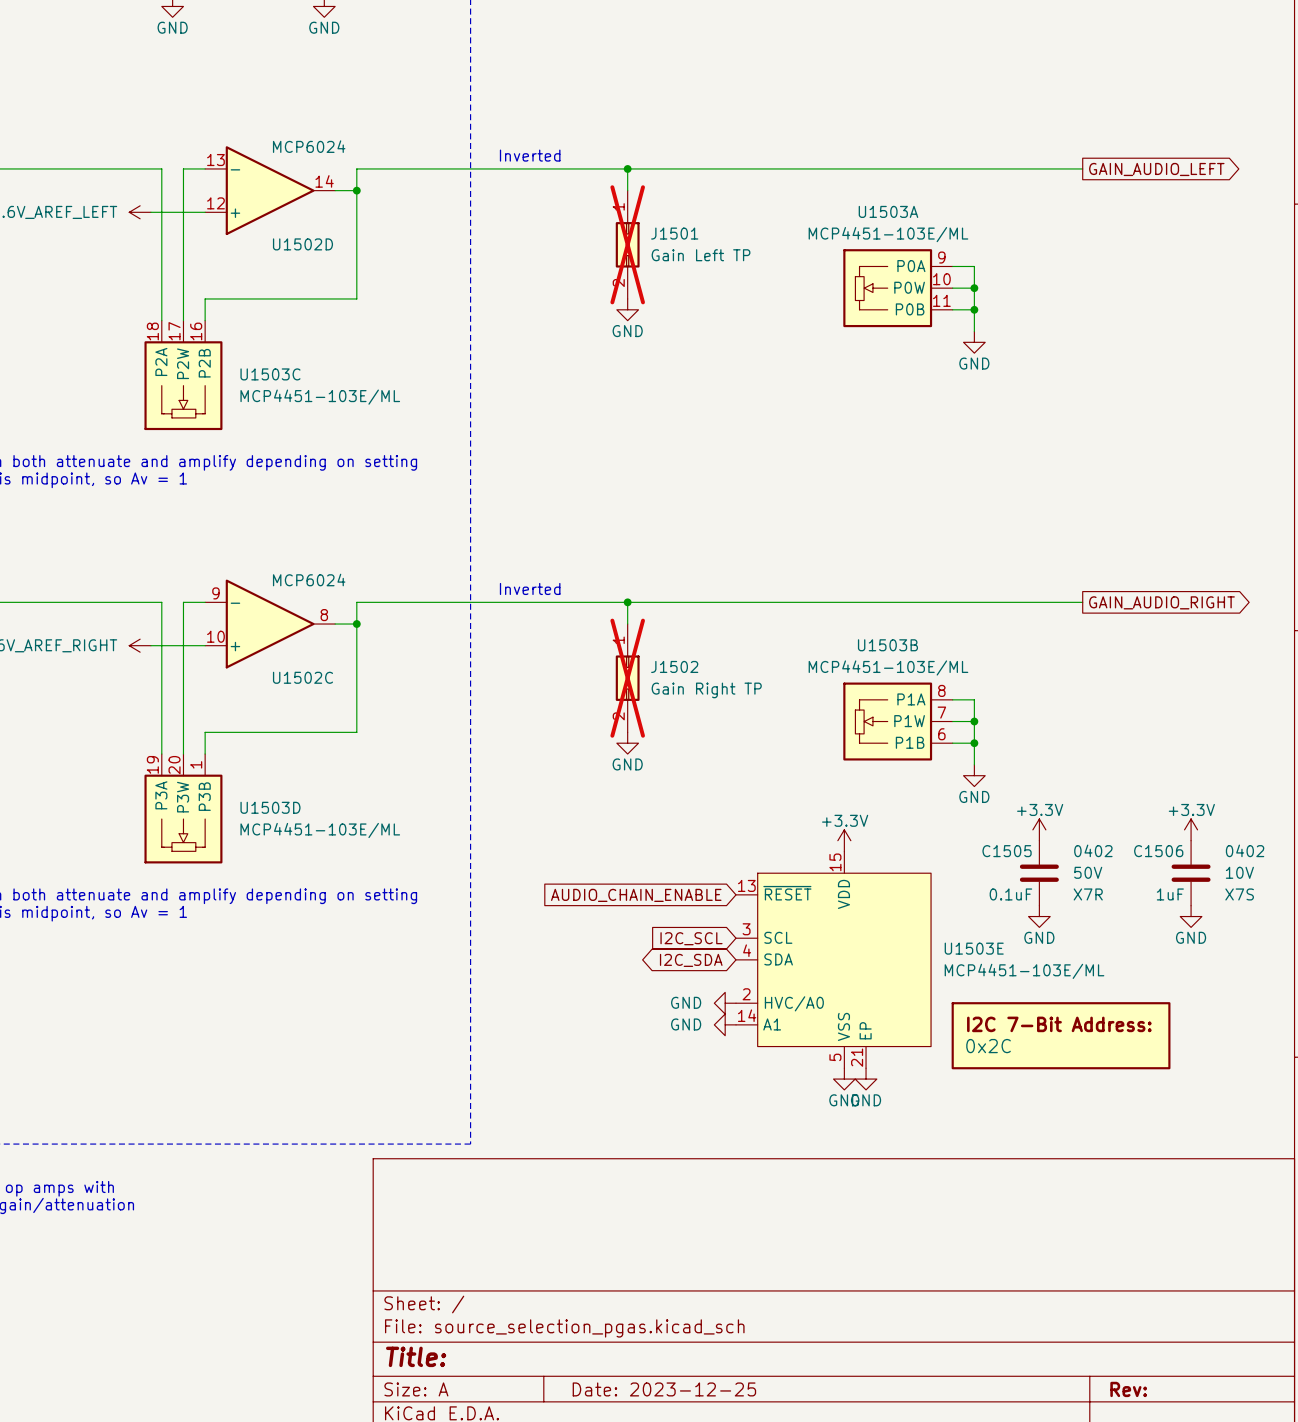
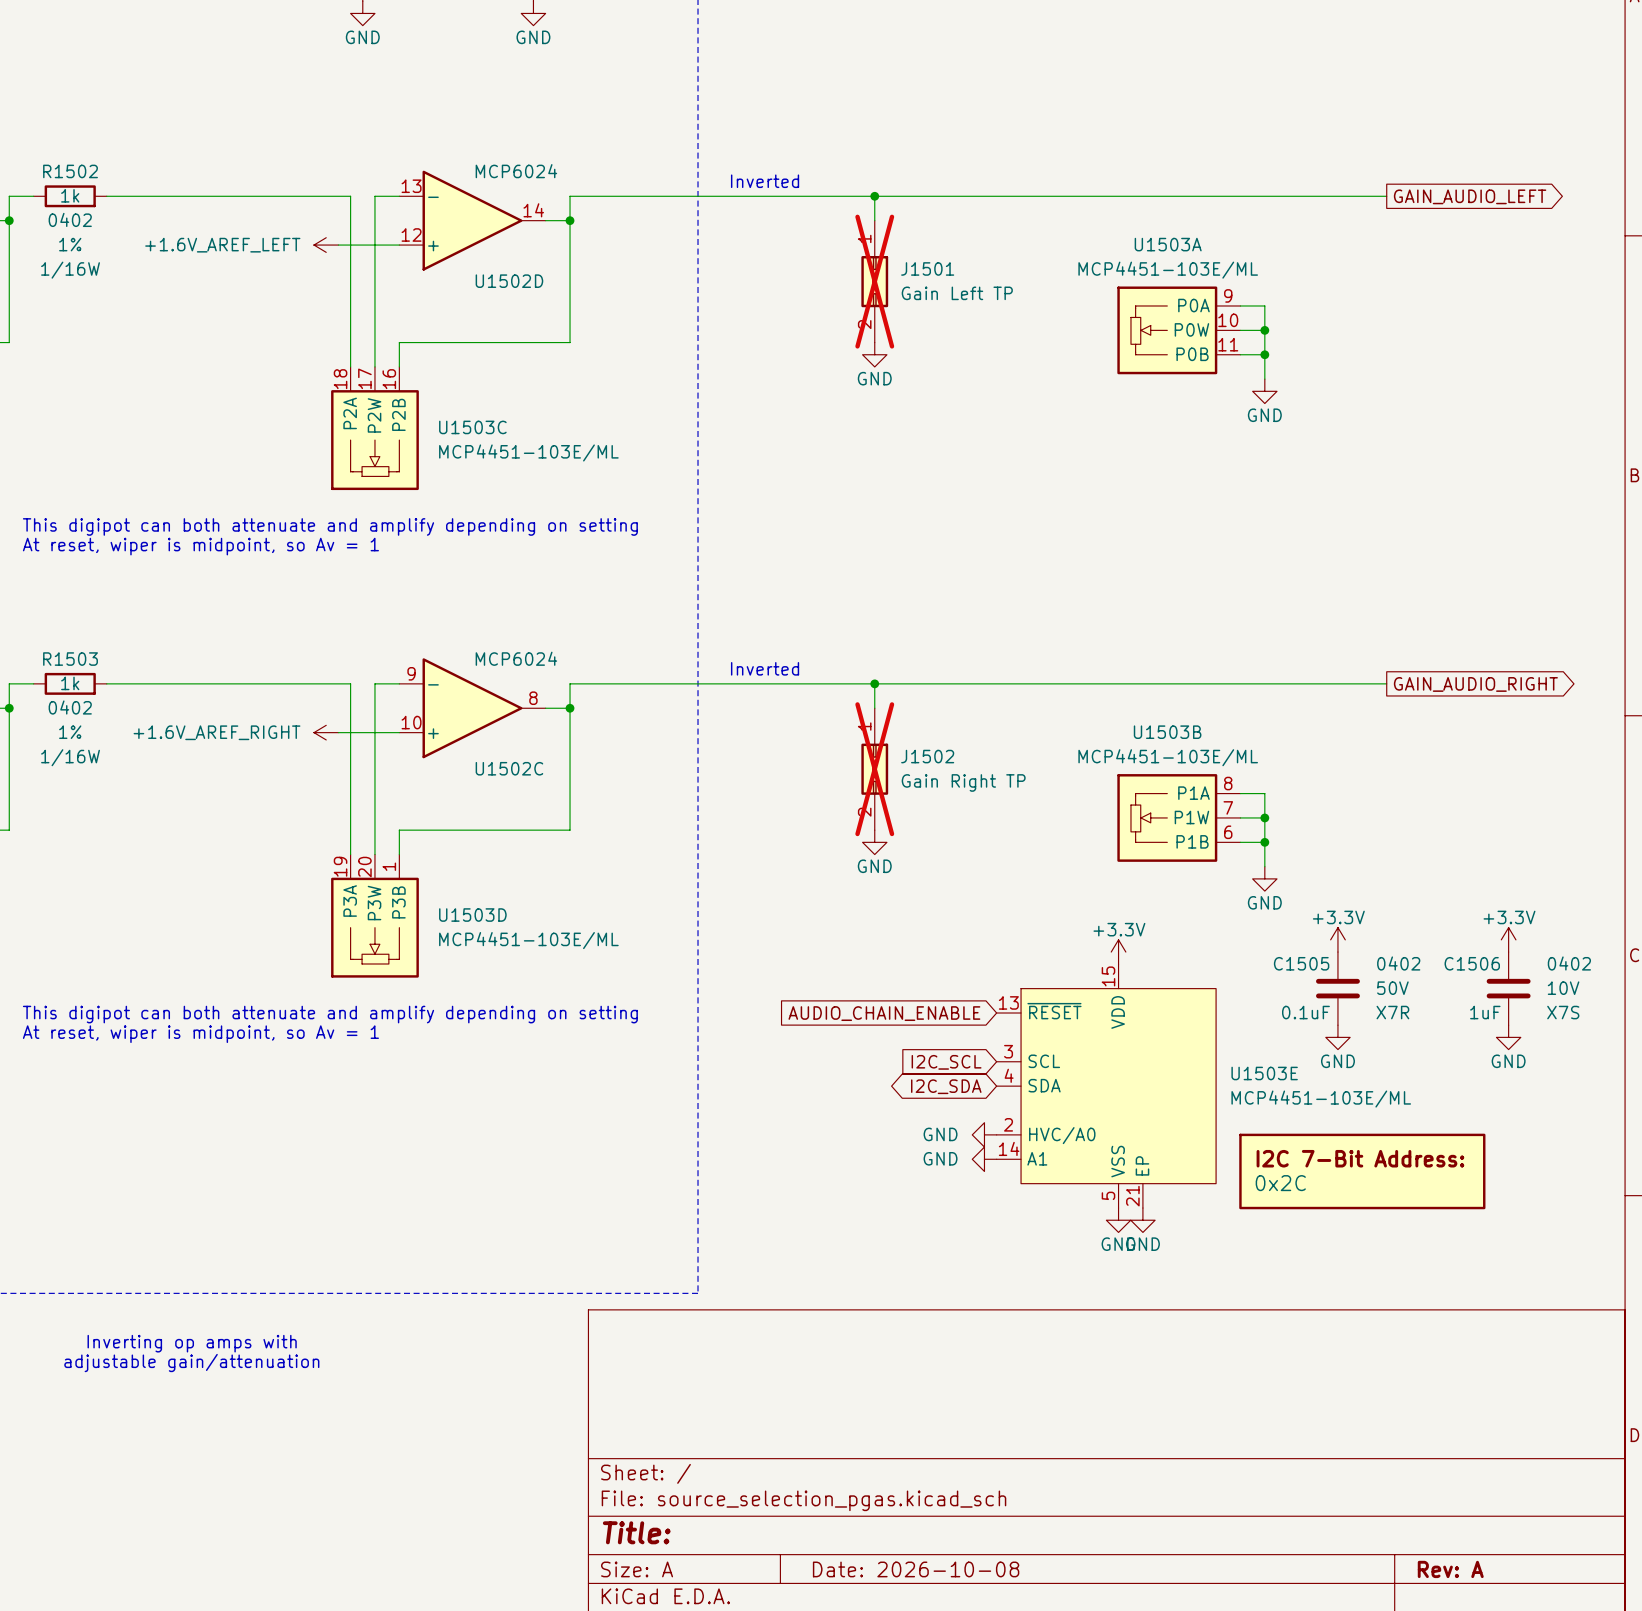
title block: Date: 2023-12-25 (664, 1389) -> Date: 2026-10-08 (916, 1569)
title block: Rev: (1128, 1389) -> Rev: A (1450, 1569)

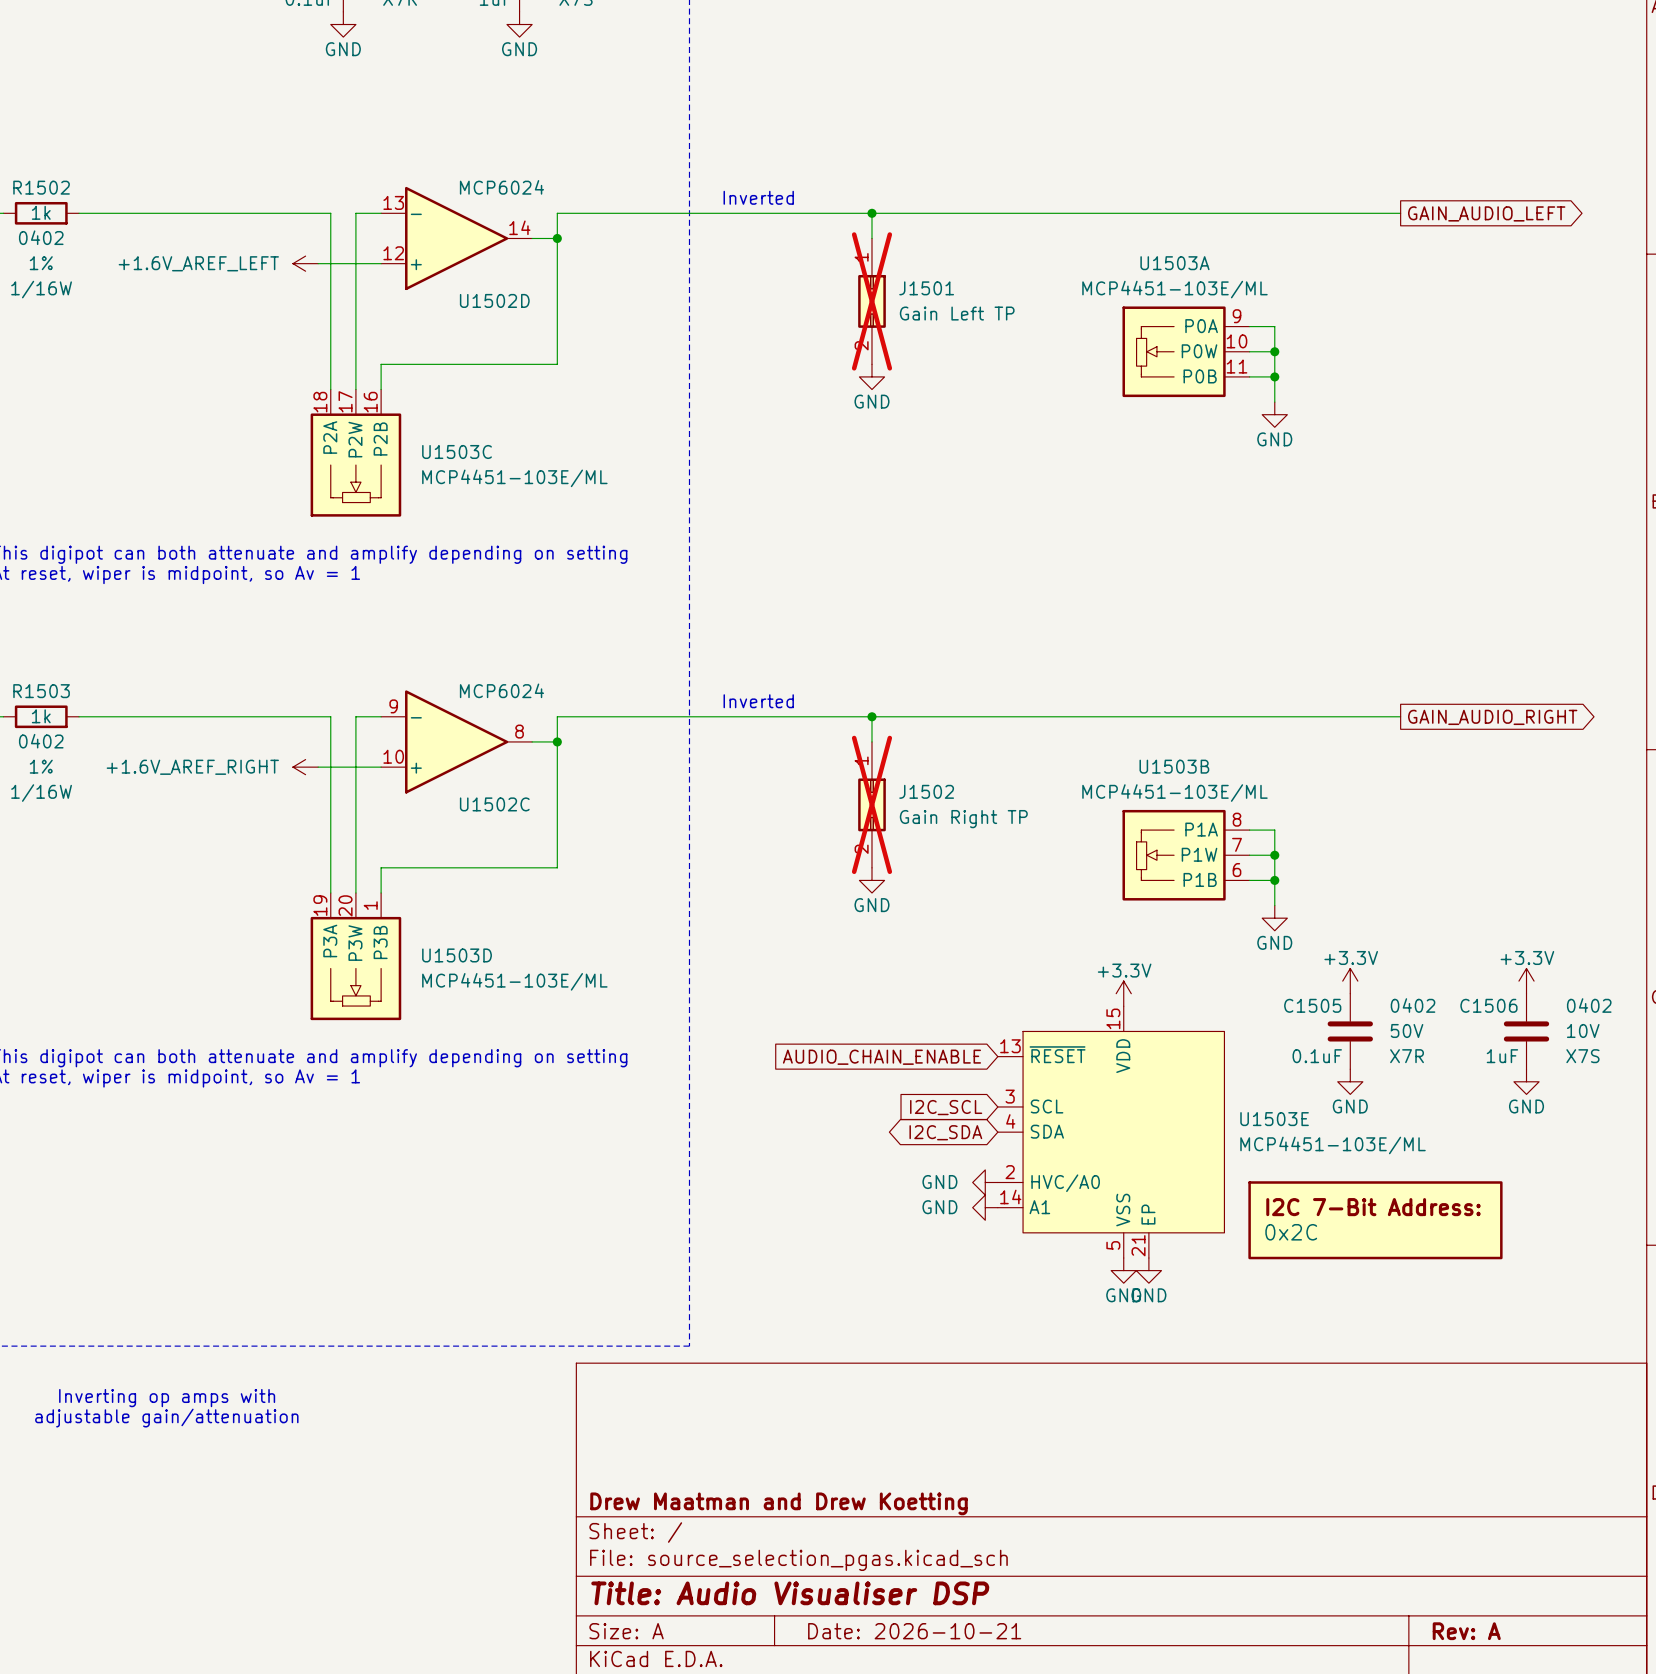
title block: none -> Drew Maatman and Drew Koetting (779, 1503)
title block: Title: (636, 1532) -> Title: Audio Visualiser DSP (790, 1593)
title block: Date: 2026-10-08 (916, 1569) -> Date: 2026-10-21 (914, 1631)

